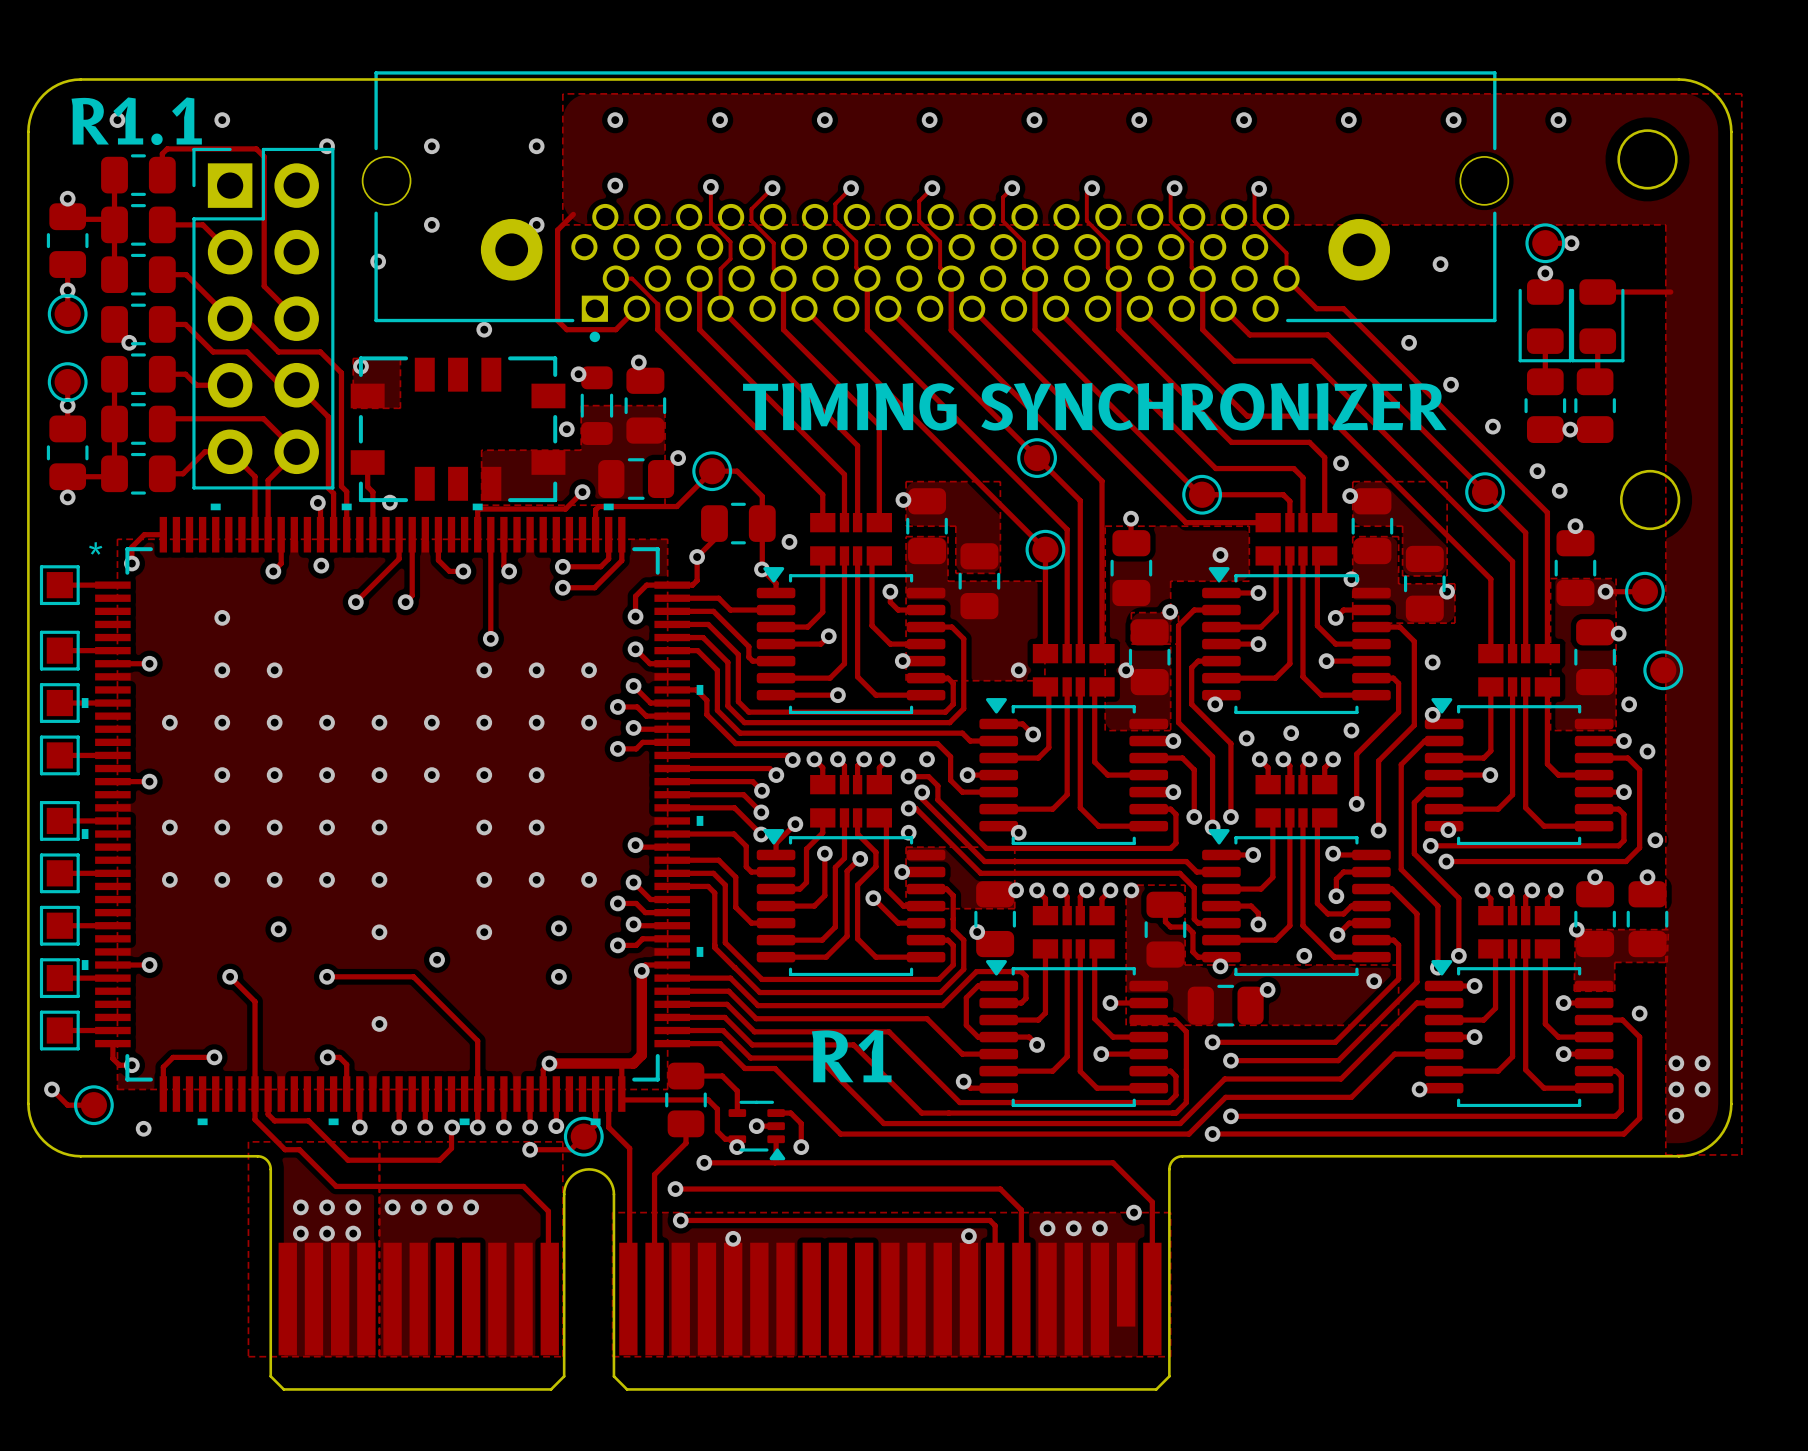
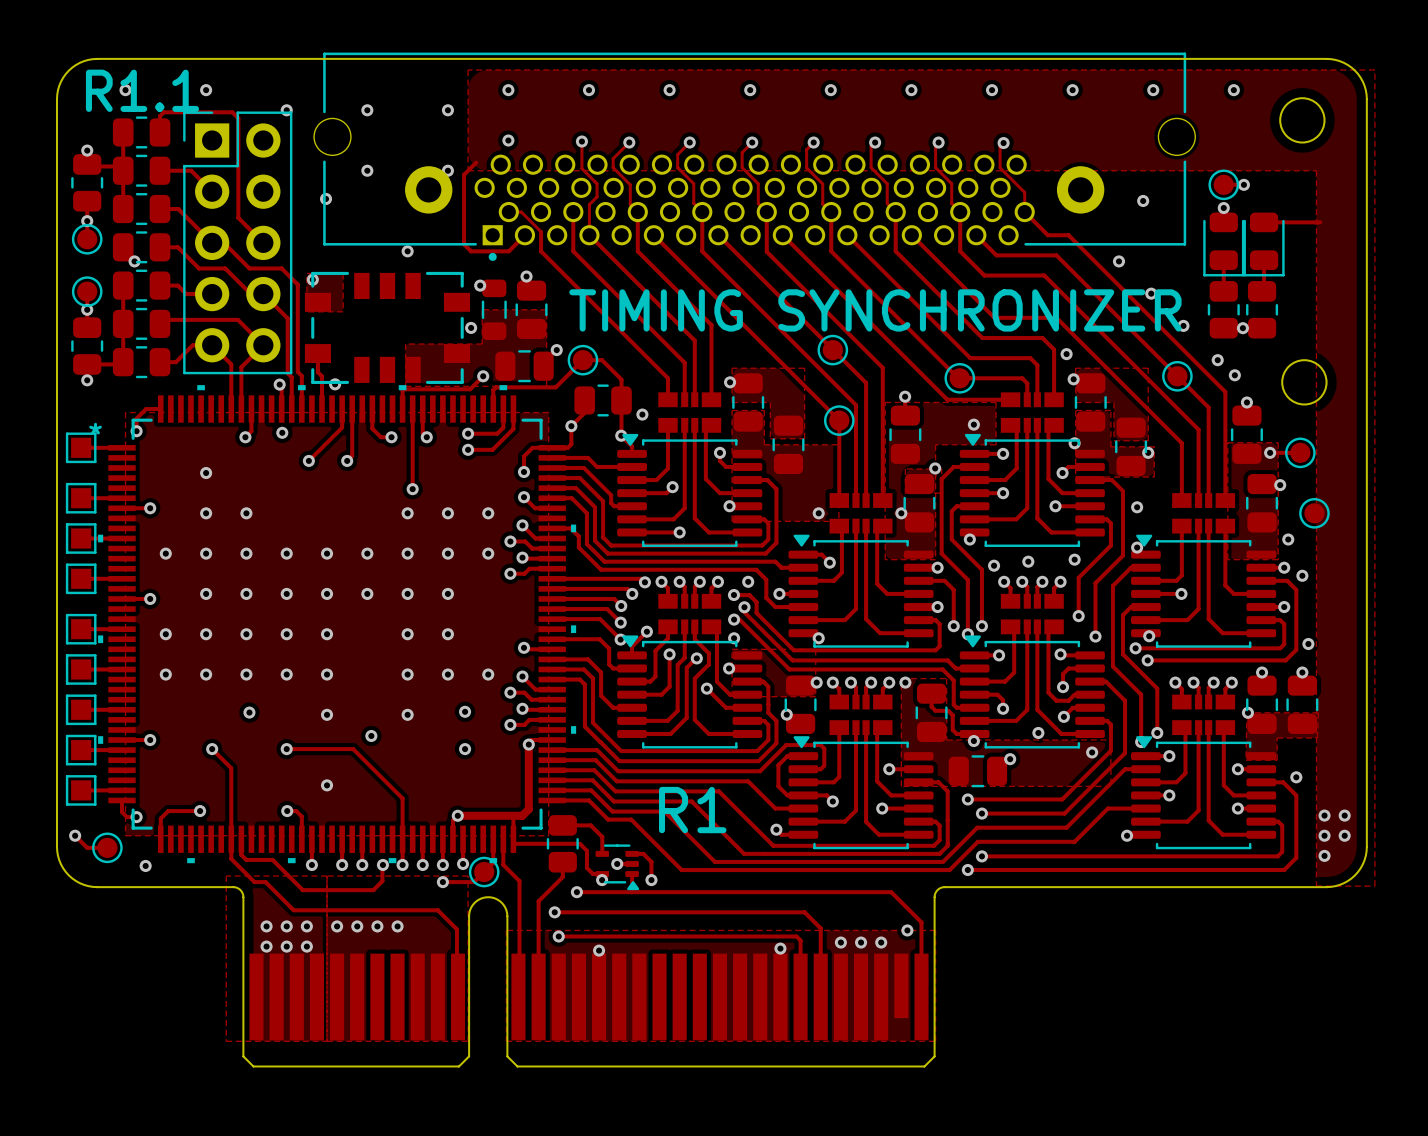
part text position: * (95, 548) -> * (95, 428)

